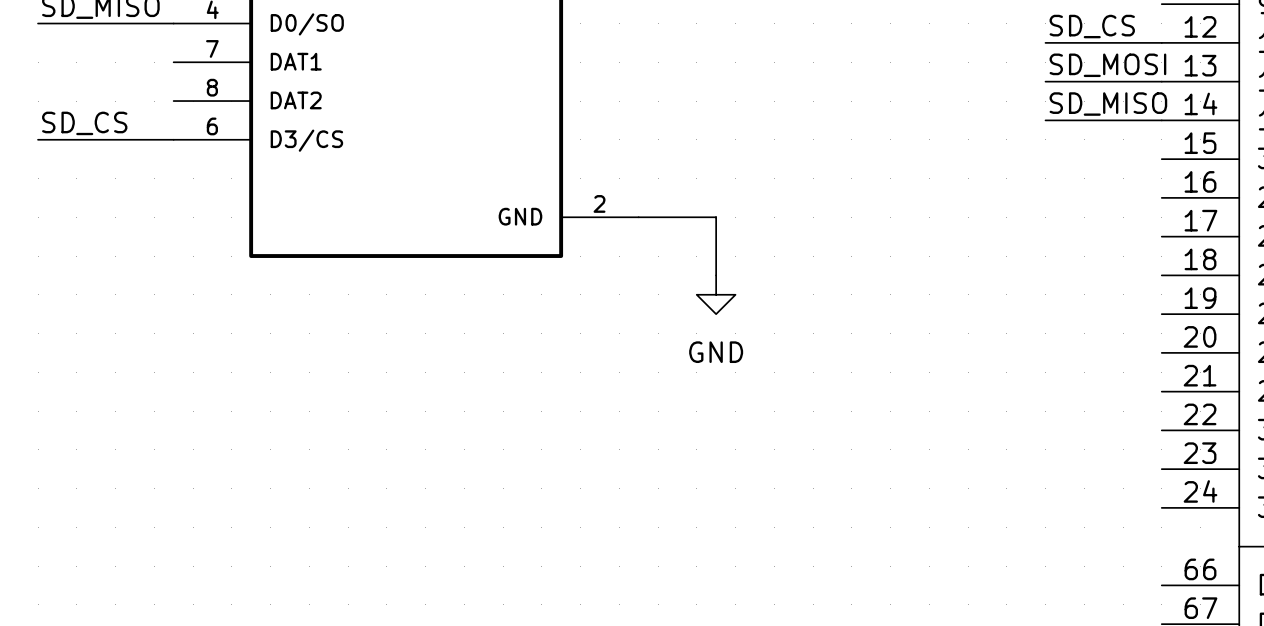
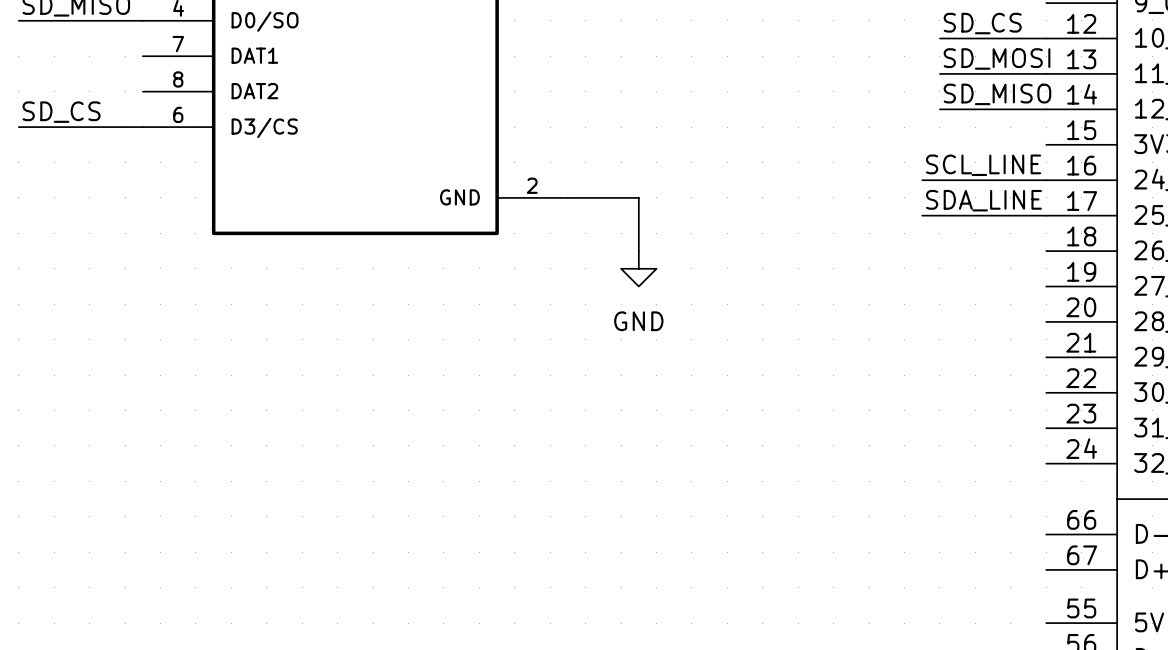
label: none -> SCL_LINE (983, 165)
wire: none -> (922, 180) (1046, 180)
label: none -> SDA_LINE (983, 200)
wire: none -> (922, 215) (1046, 215)

